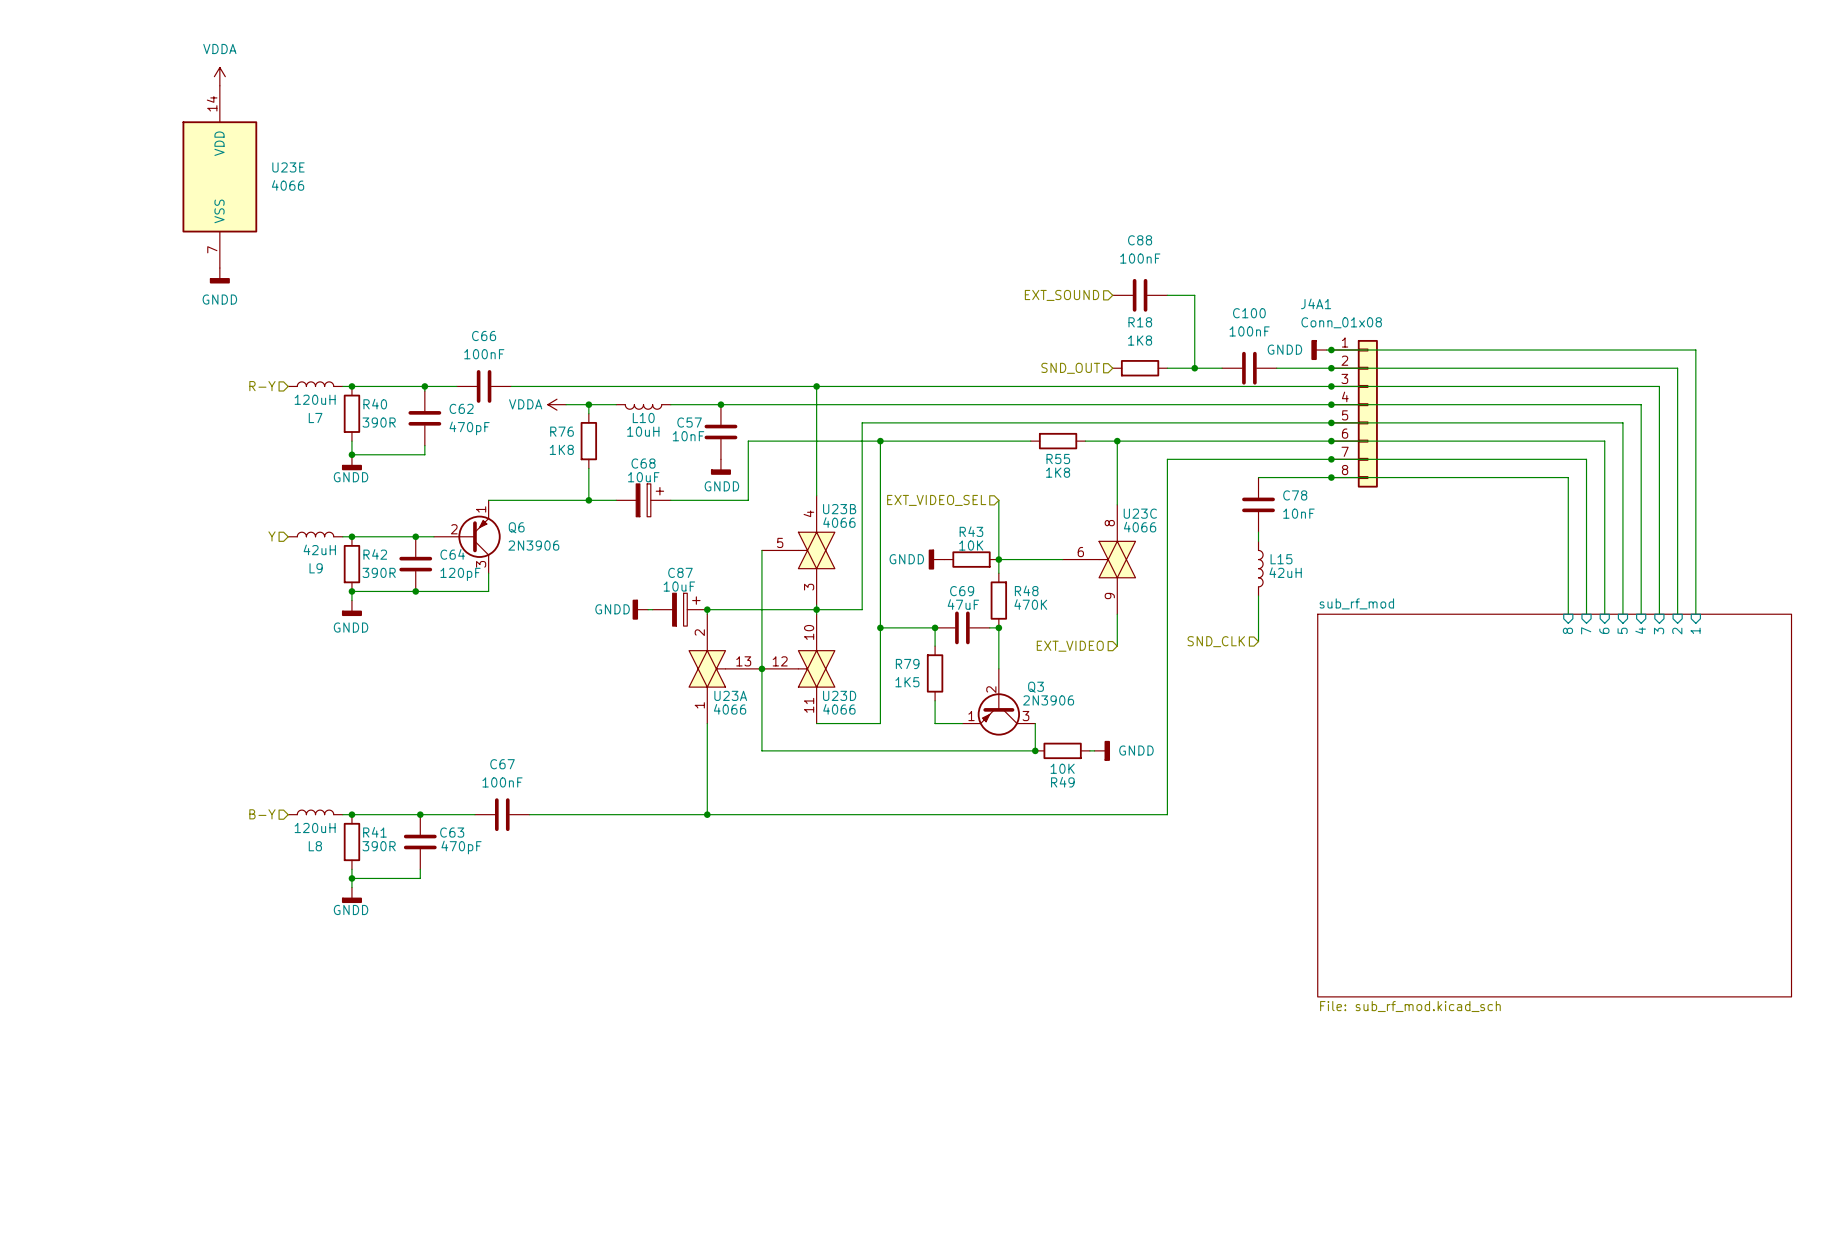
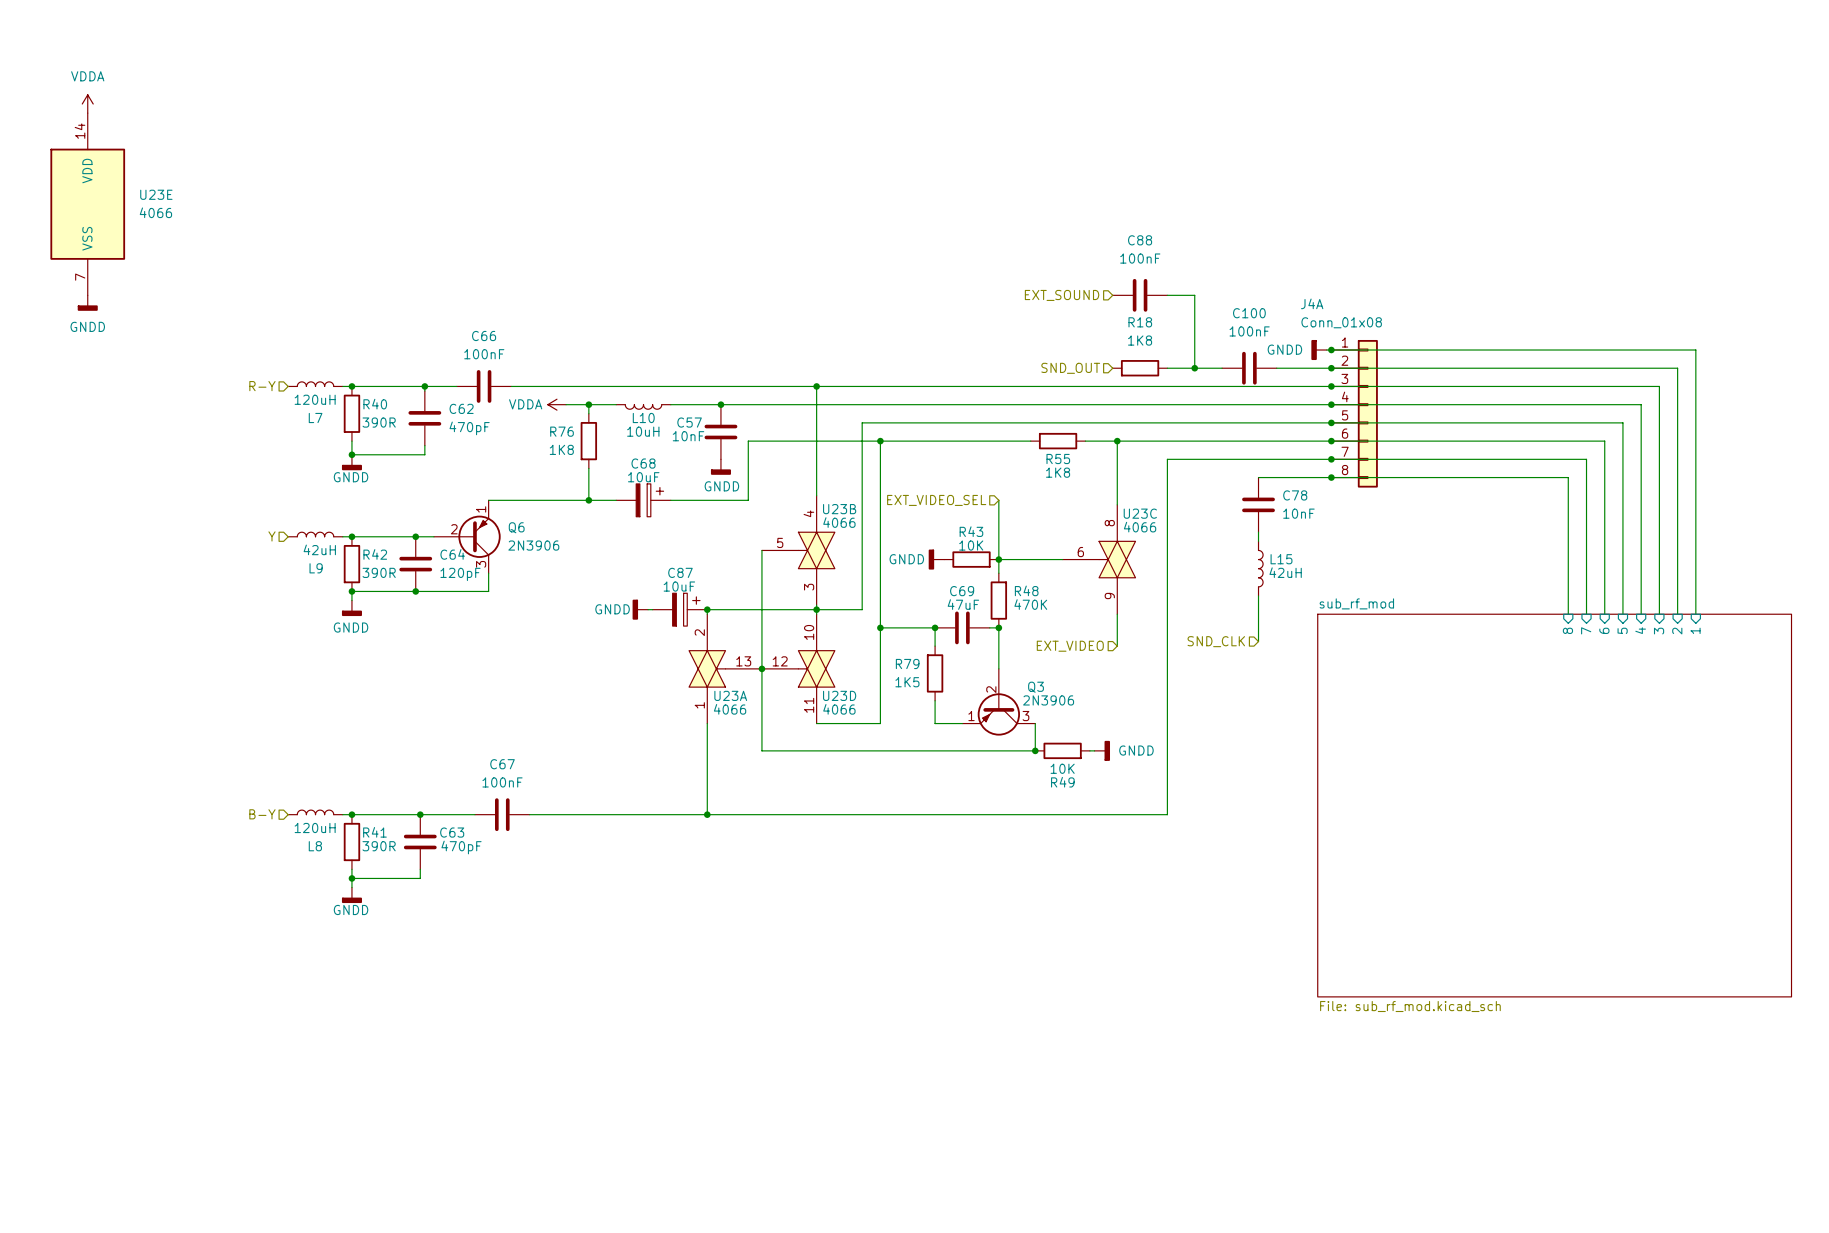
power symbol position: VDDA (219, 76) -> VDDA (87, 104)
U23E position: (219, 176) -> (87, 204)
power symbol position: GNDD (219, 275) -> GNDD (87, 303)
J4A1 name: J4A1 (1316, 303) -> J4A (1312, 303)

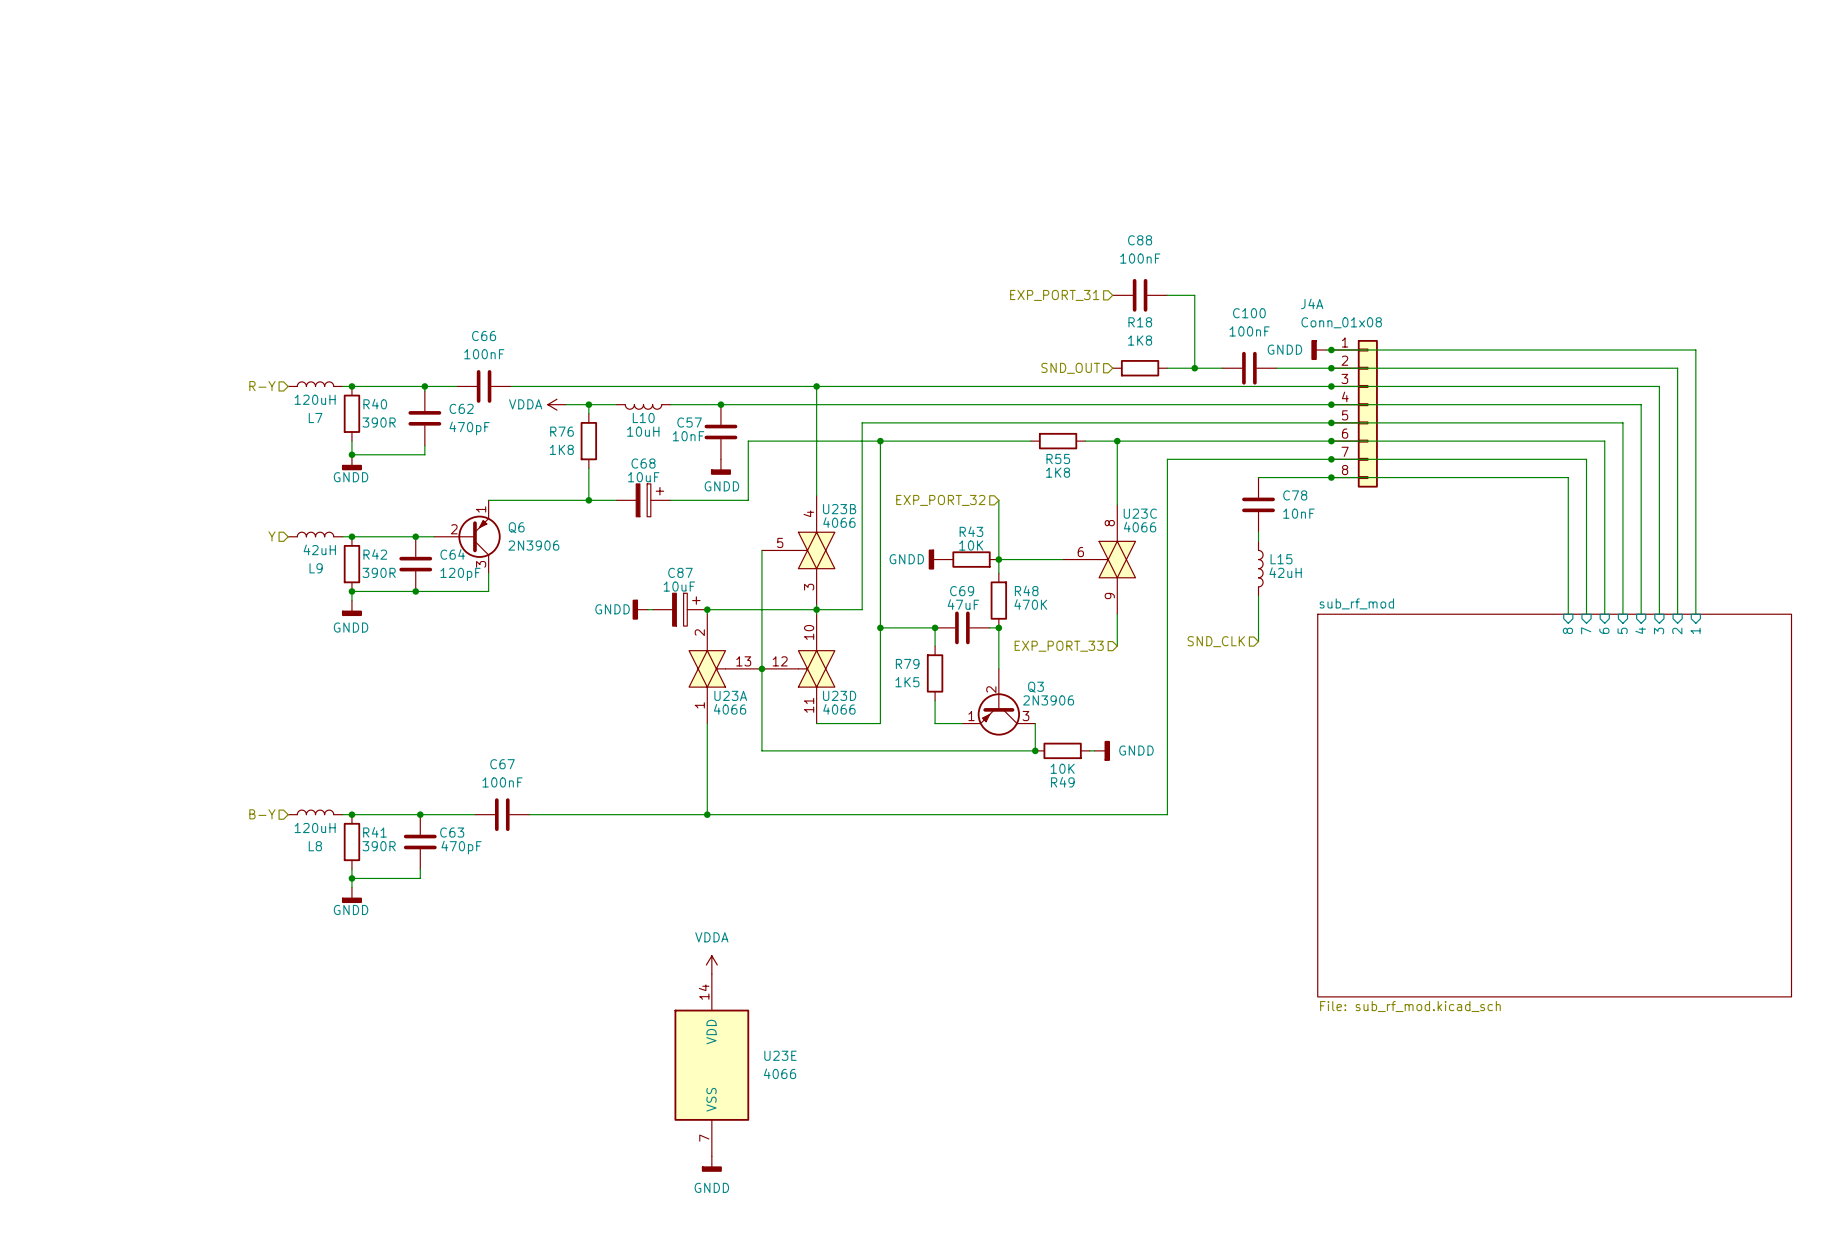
power symbol: VDDA (87, 104) -> none
U23E position: (87, 204) -> (711, 1065)
hierarchical label: EXT_SOUND (1062, 295) -> EXP_PORT_31 (1054, 295)
power symbol: GNDD (87, 303) -> none
hierarchical label: EXT_VIDEO_SEL (936, 500) -> EXP_PORT_32 (940, 500)
hierarchical label: EXT_VIDEO (1070, 646) -> EXP_PORT_33 (1059, 646)
power symbol: none -> VDDA (711, 965)
power symbol: none -> GNDD (711, 1164)

